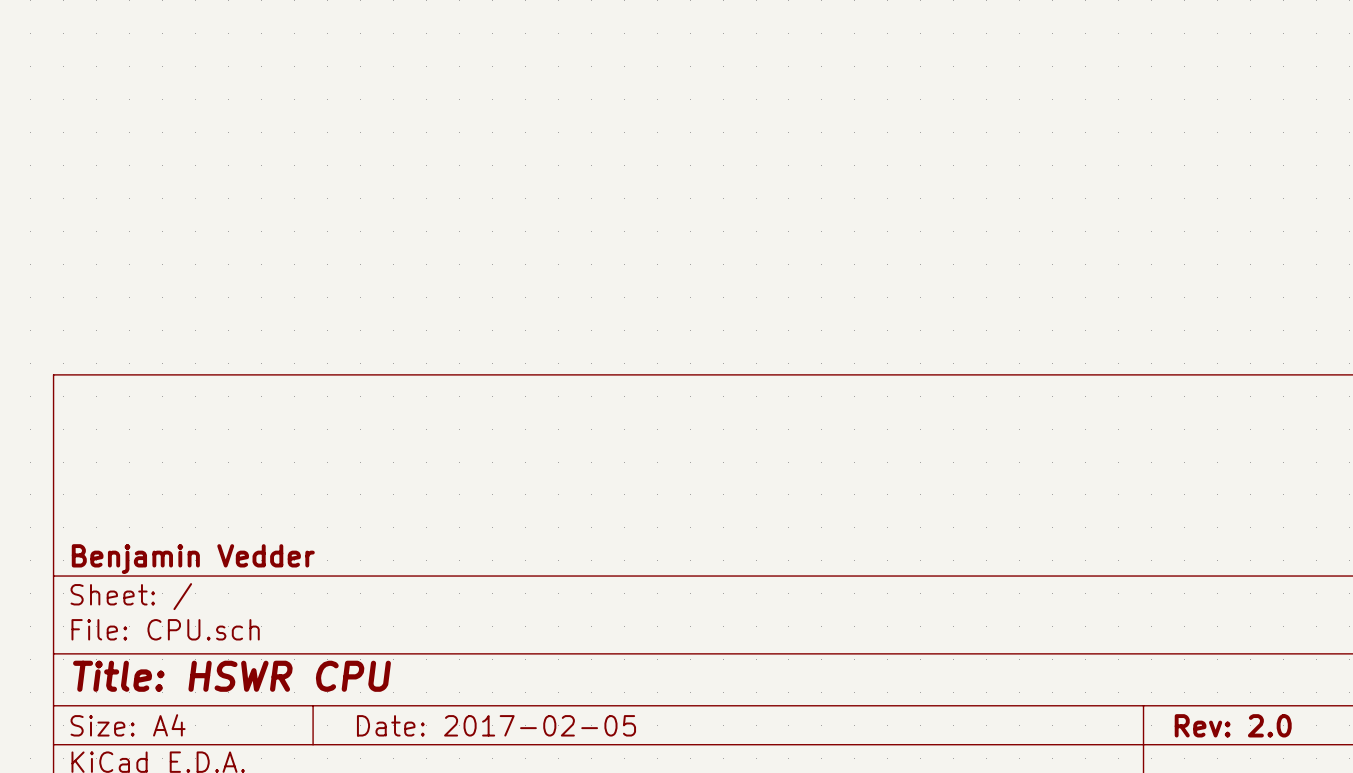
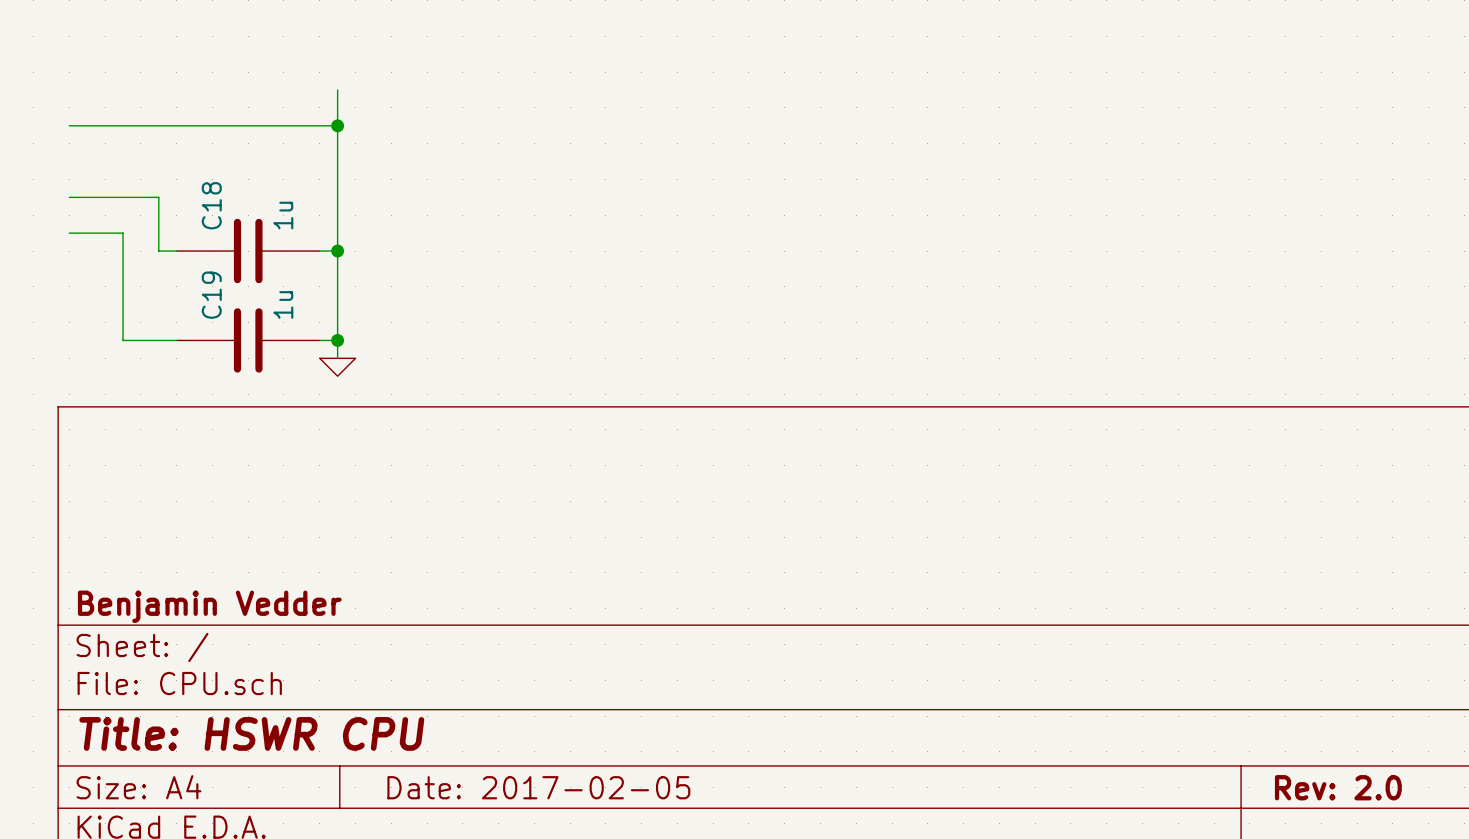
wire: none -> (337, 90) (337, 358)
wire: none -> (69, 125) (337, 125)
junction: none -> (337, 125)
wire: none -> (69, 197) (158, 197) (158, 251) (176, 251)
wire: none -> (69, 233) (123, 233) (123, 340) (176, 340)
C18: none -> 1u (248, 251)
wire: none -> (319, 251) (337, 251)
junction: none -> (337, 251)
C19: none -> 1u (248, 340)
wire: none -> (319, 340) (337, 340)
junction: none -> (337, 340)
power symbol: none -> (337, 367)

